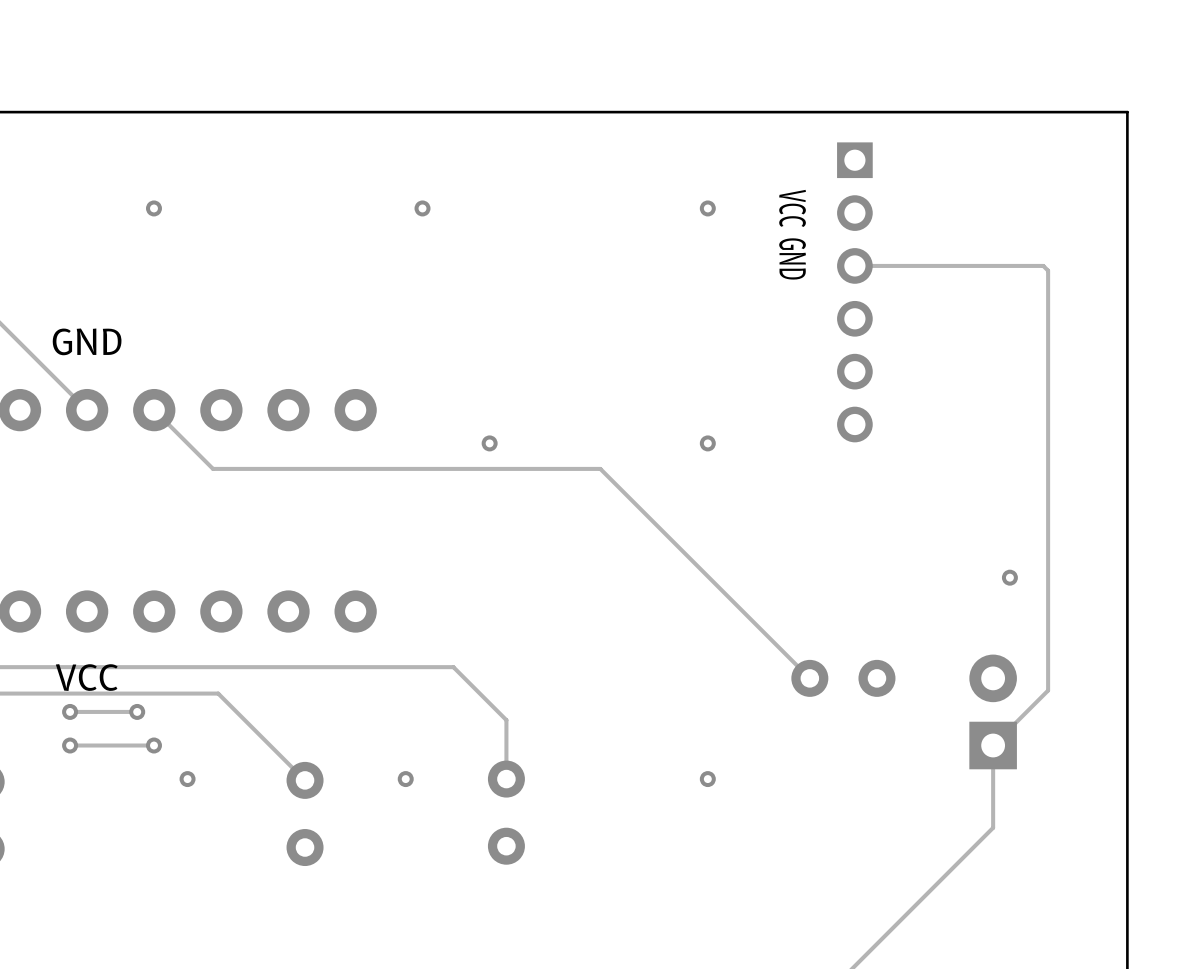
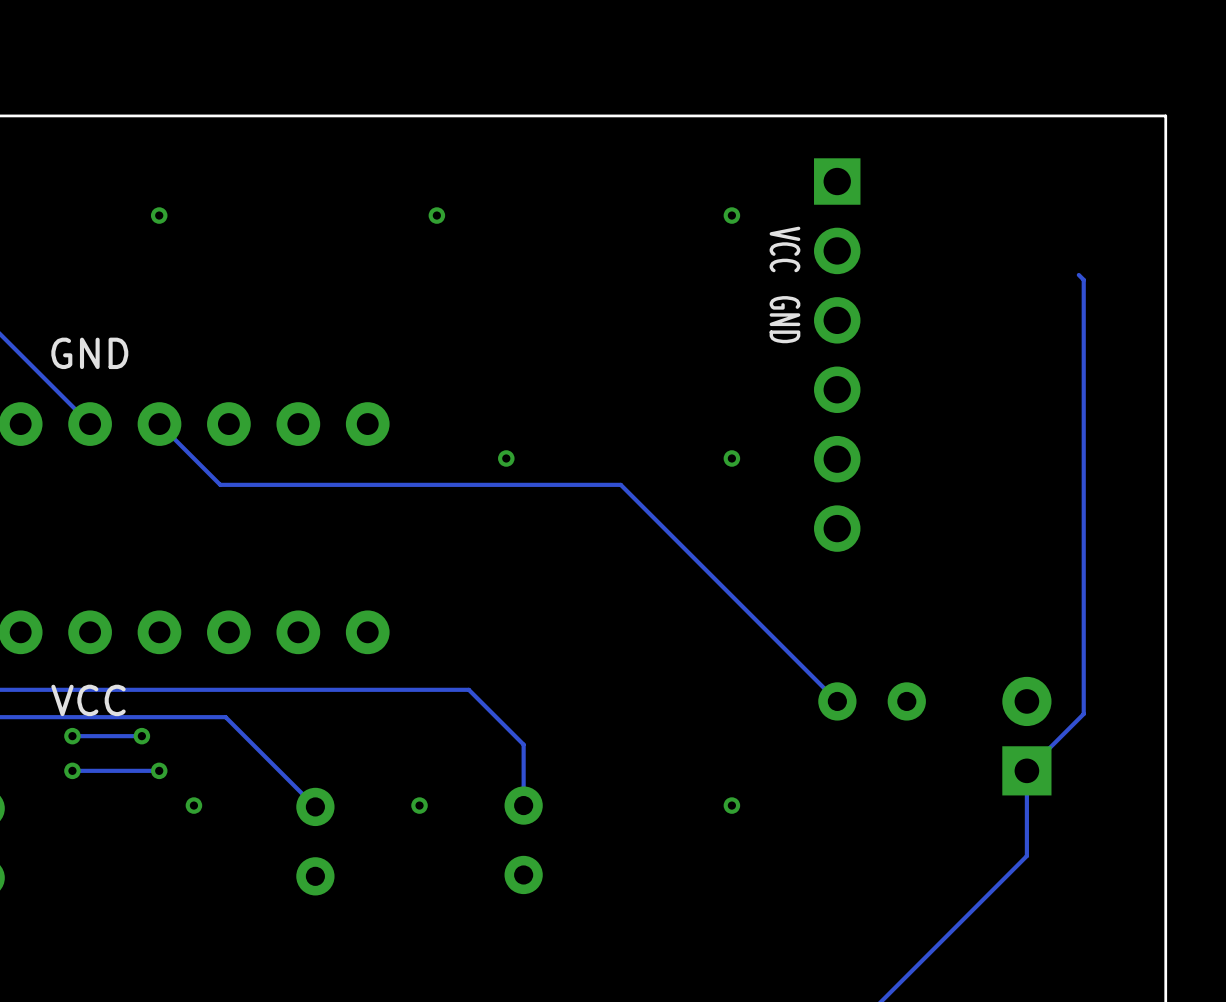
text position: VCC (792, 208) -> VCC (784, 249)
text position: GND (792, 258) -> GND (784, 319)
track: (1043, 265) (854, 265) -> none
part: (854, 292) -> none
part: none -> (837, 355)
via: (1009, 577) -> none

